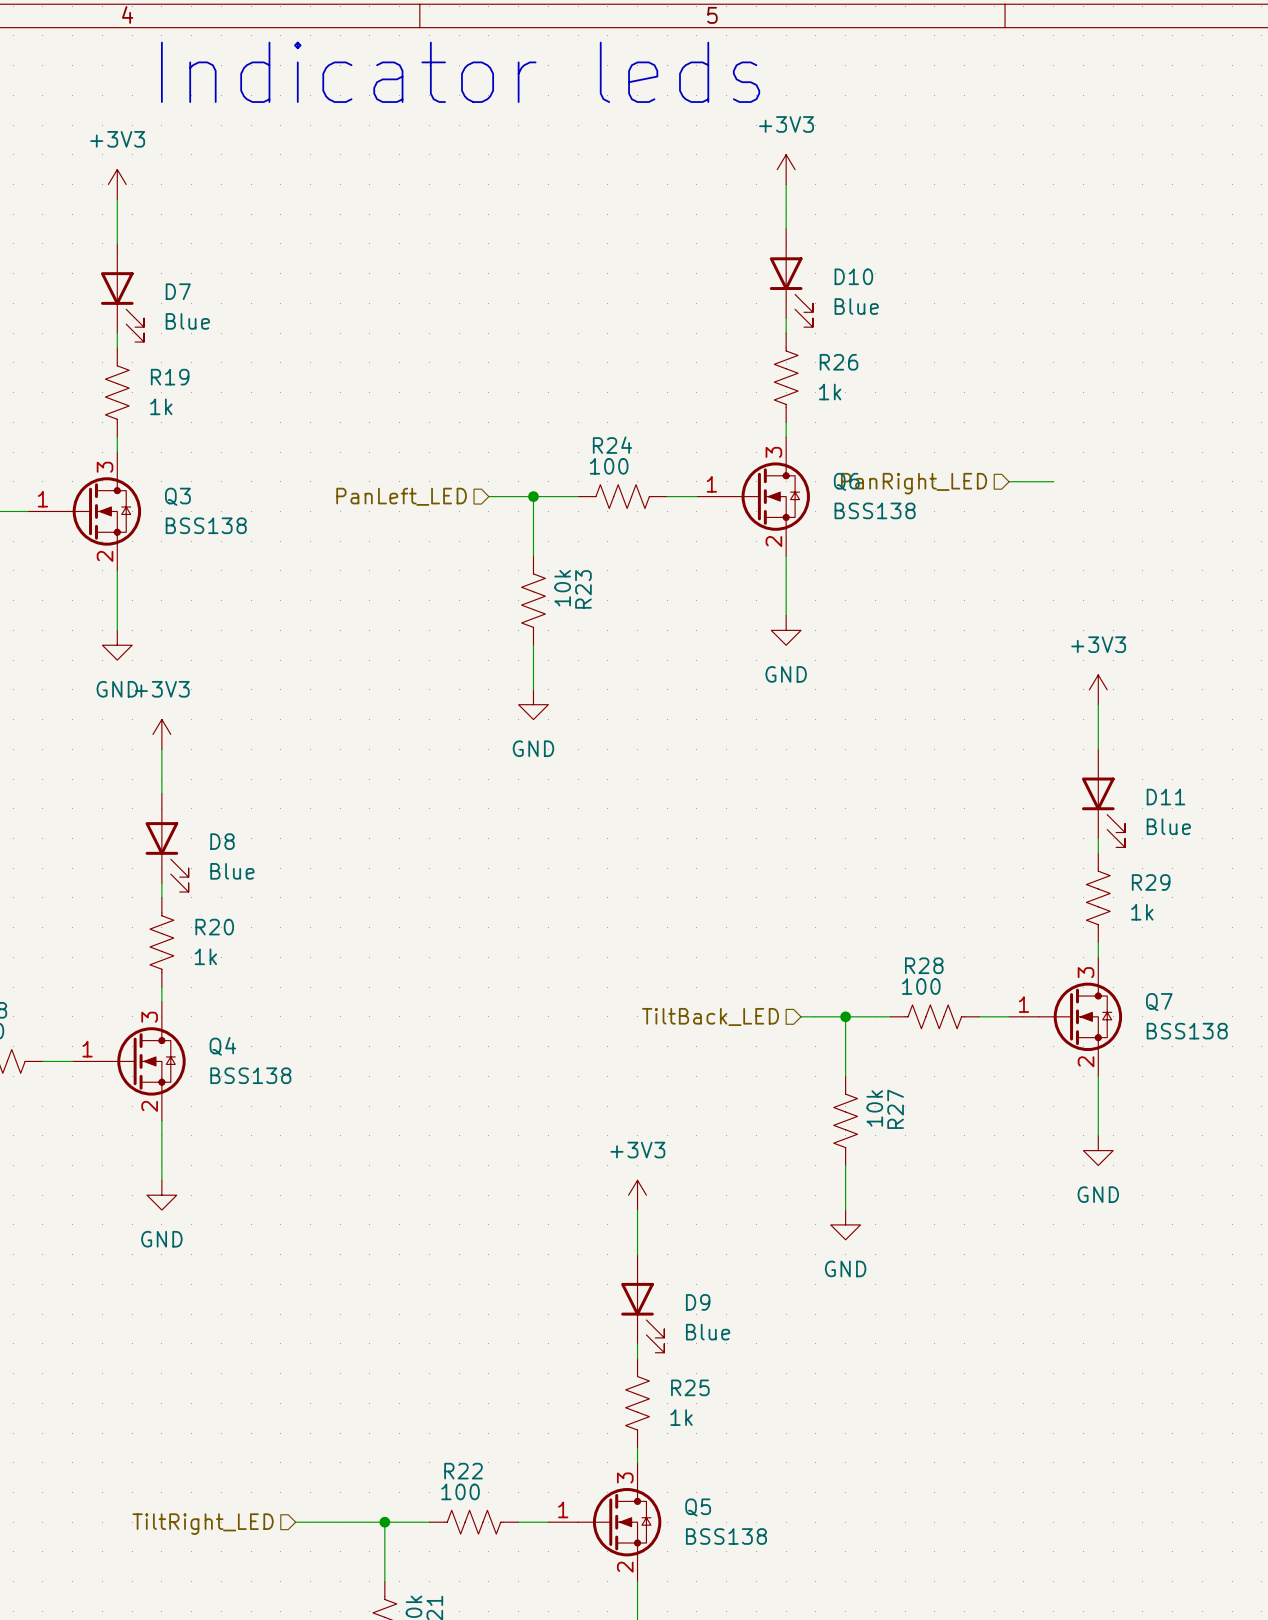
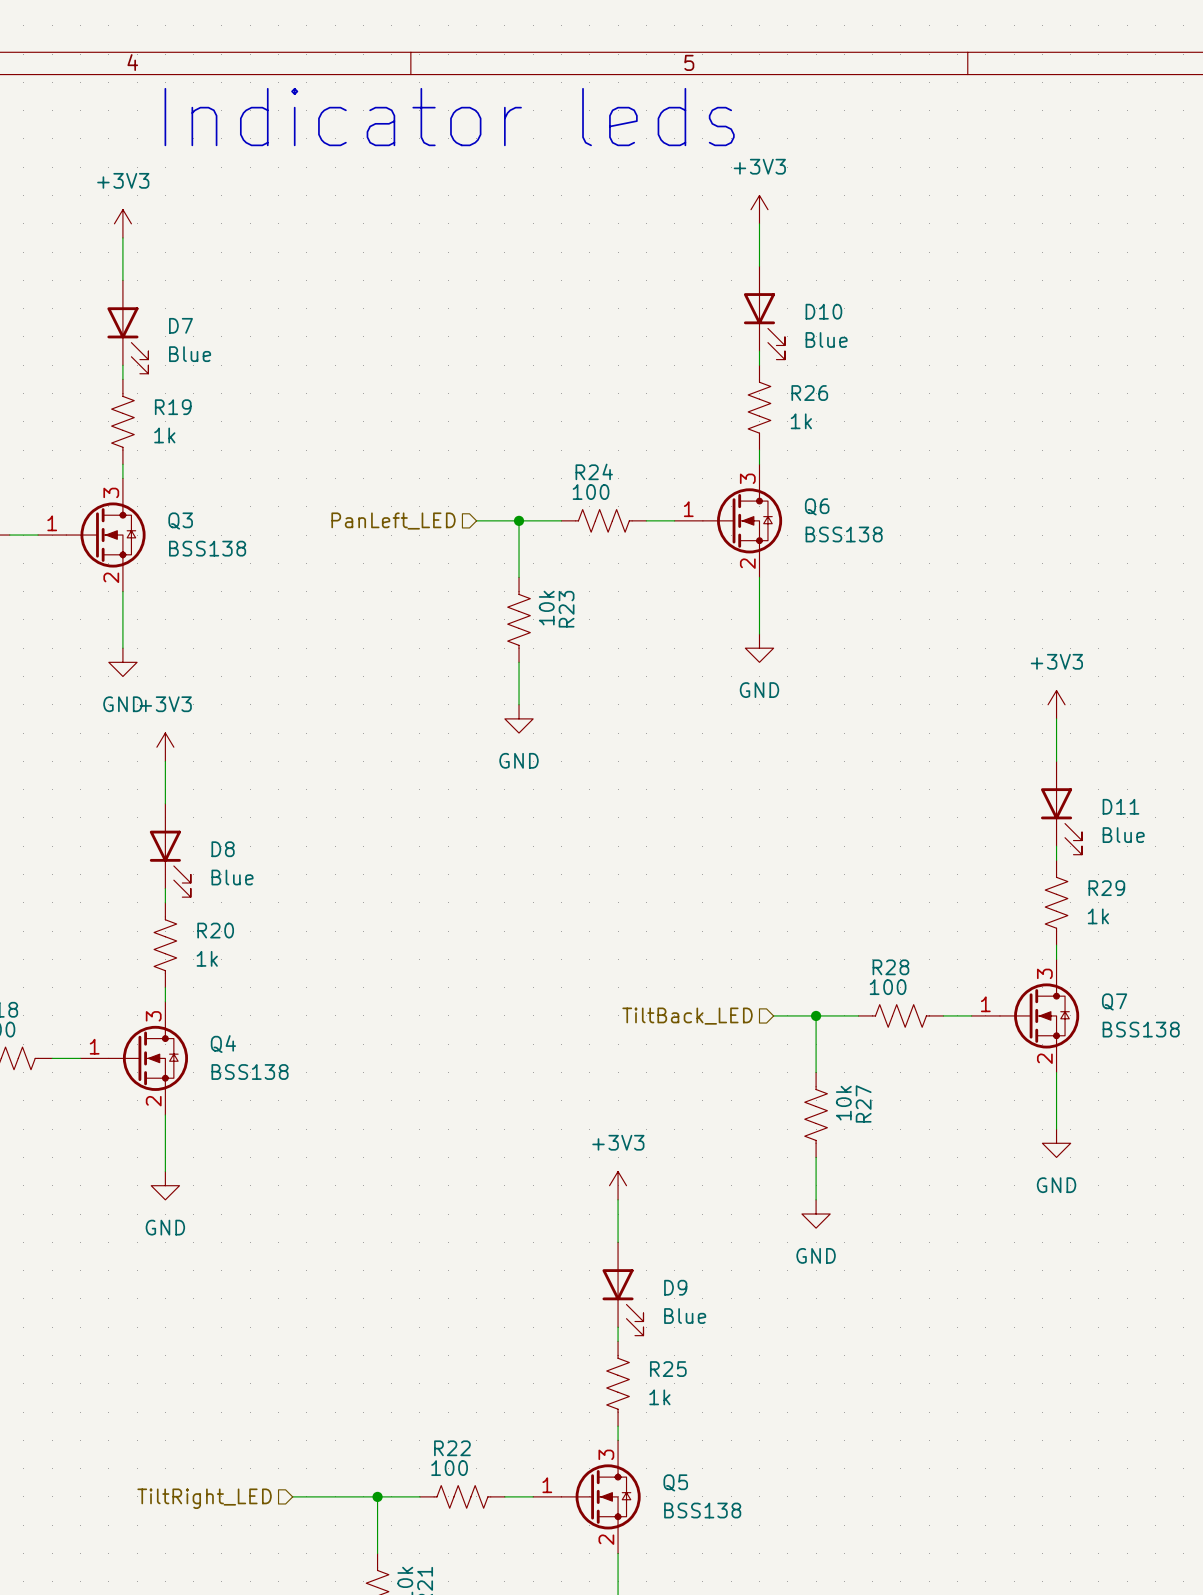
wire: (1009, 481) (1053, 481) -> none
hierarchical label: PanRight_LED (914, 483) -> none

